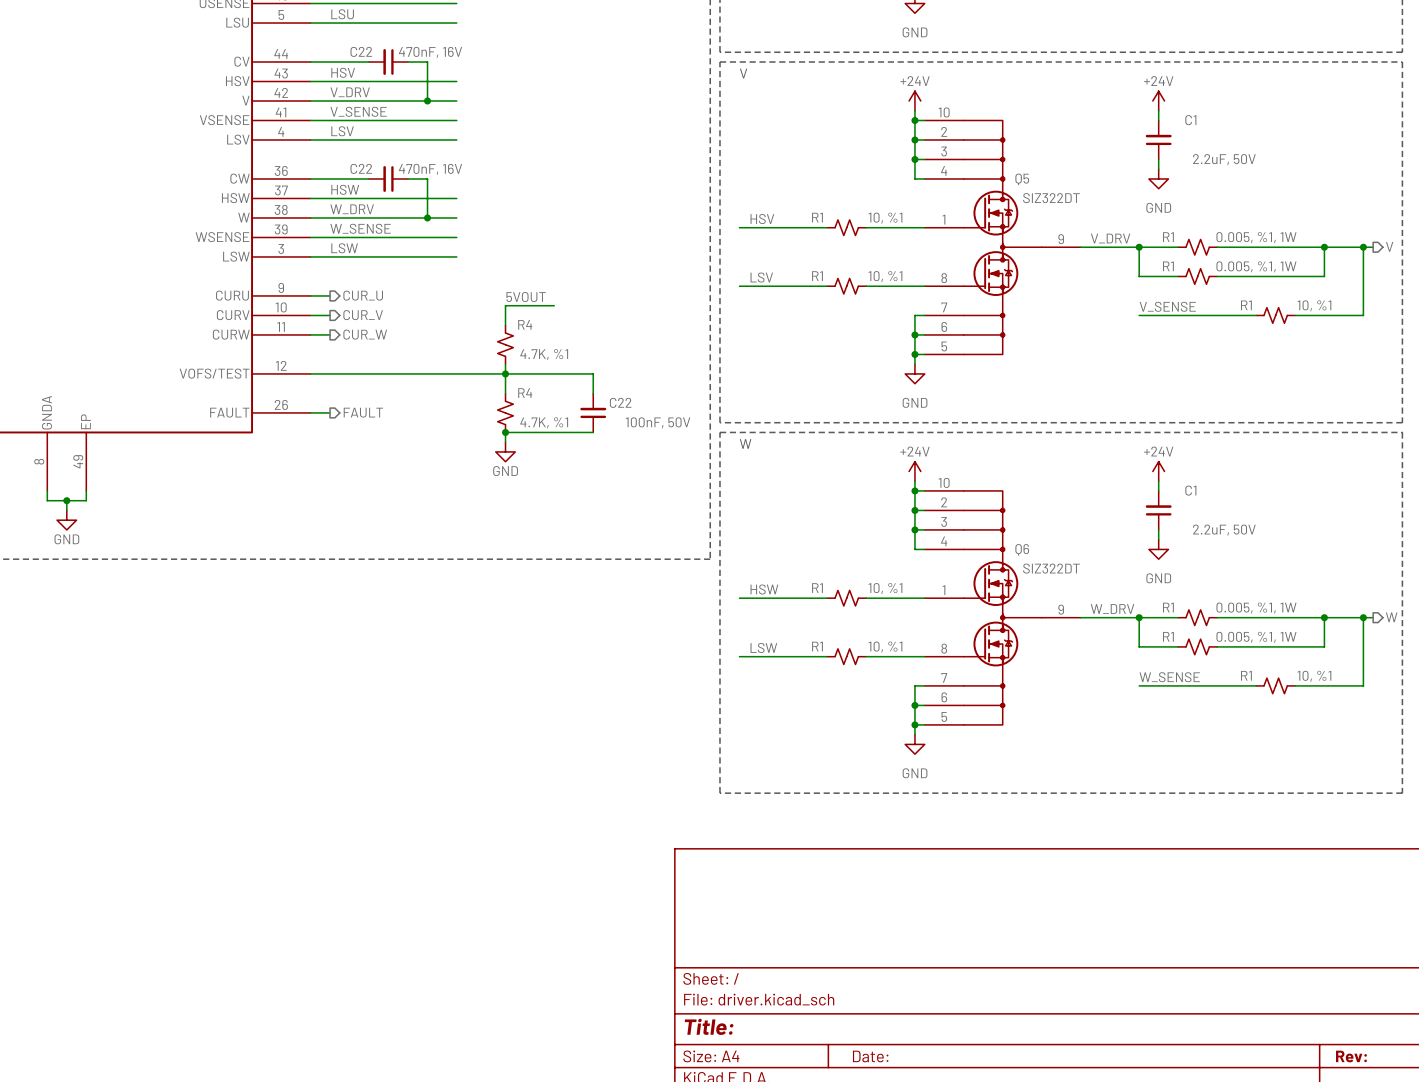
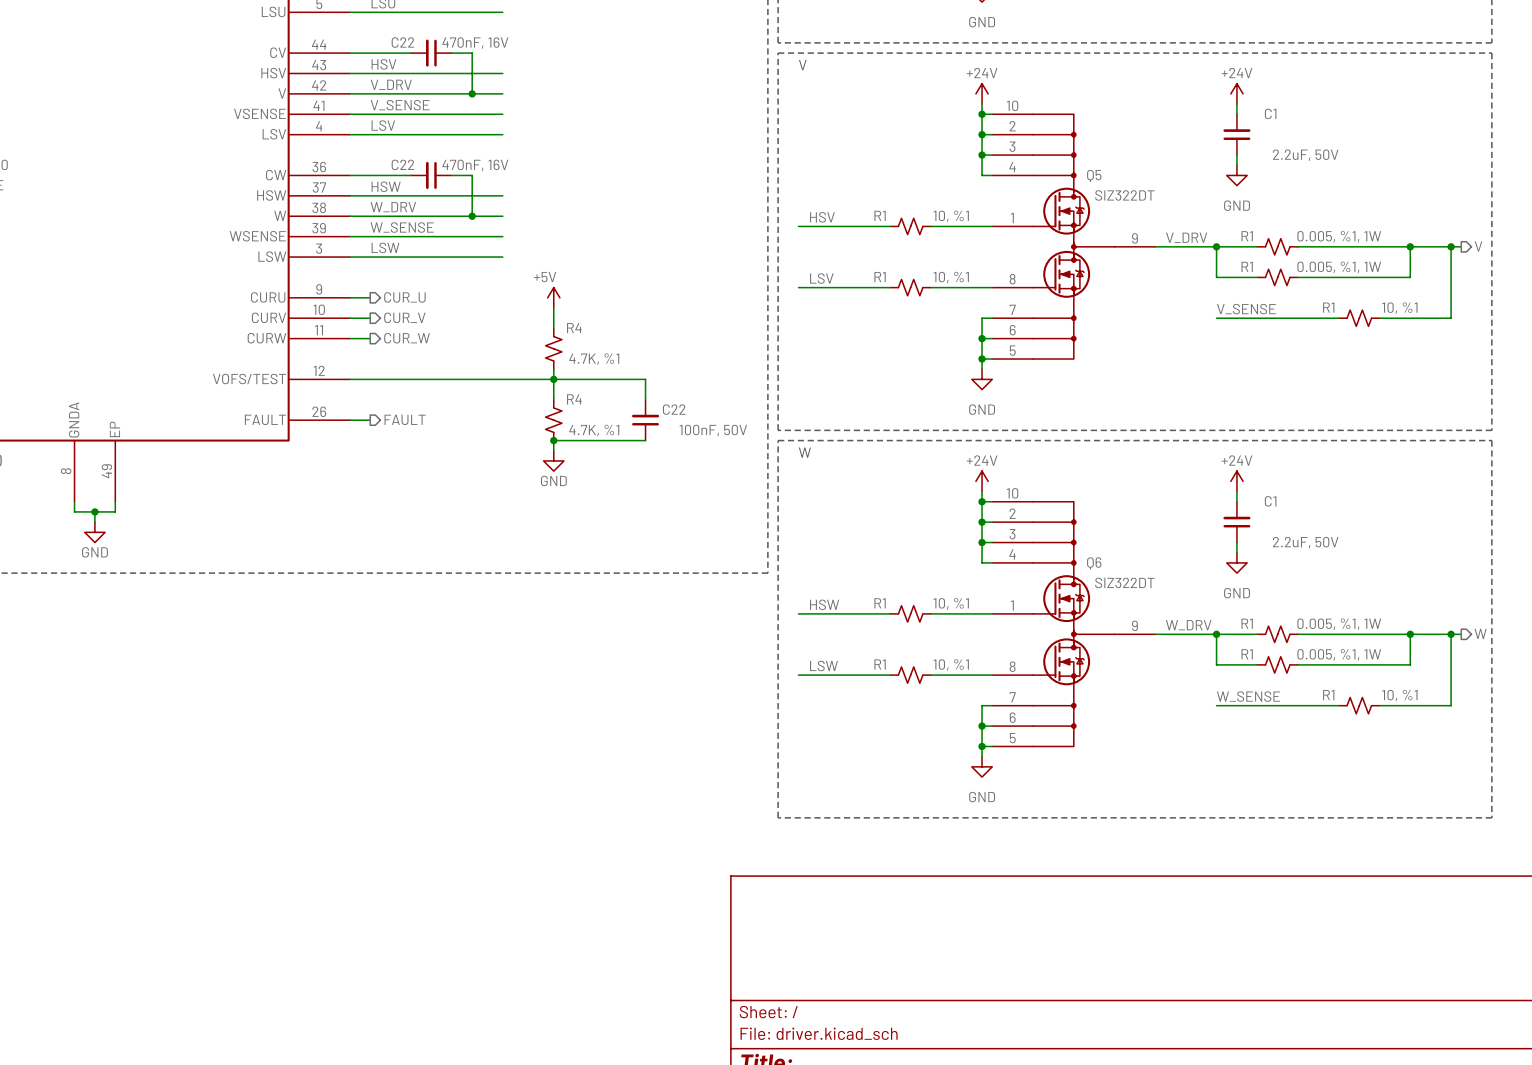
power symbol: none -> +5V (553, 297)
label: 5VOUT (526, 297) -> none
wire: (505, 305) (554, 305) -> none

